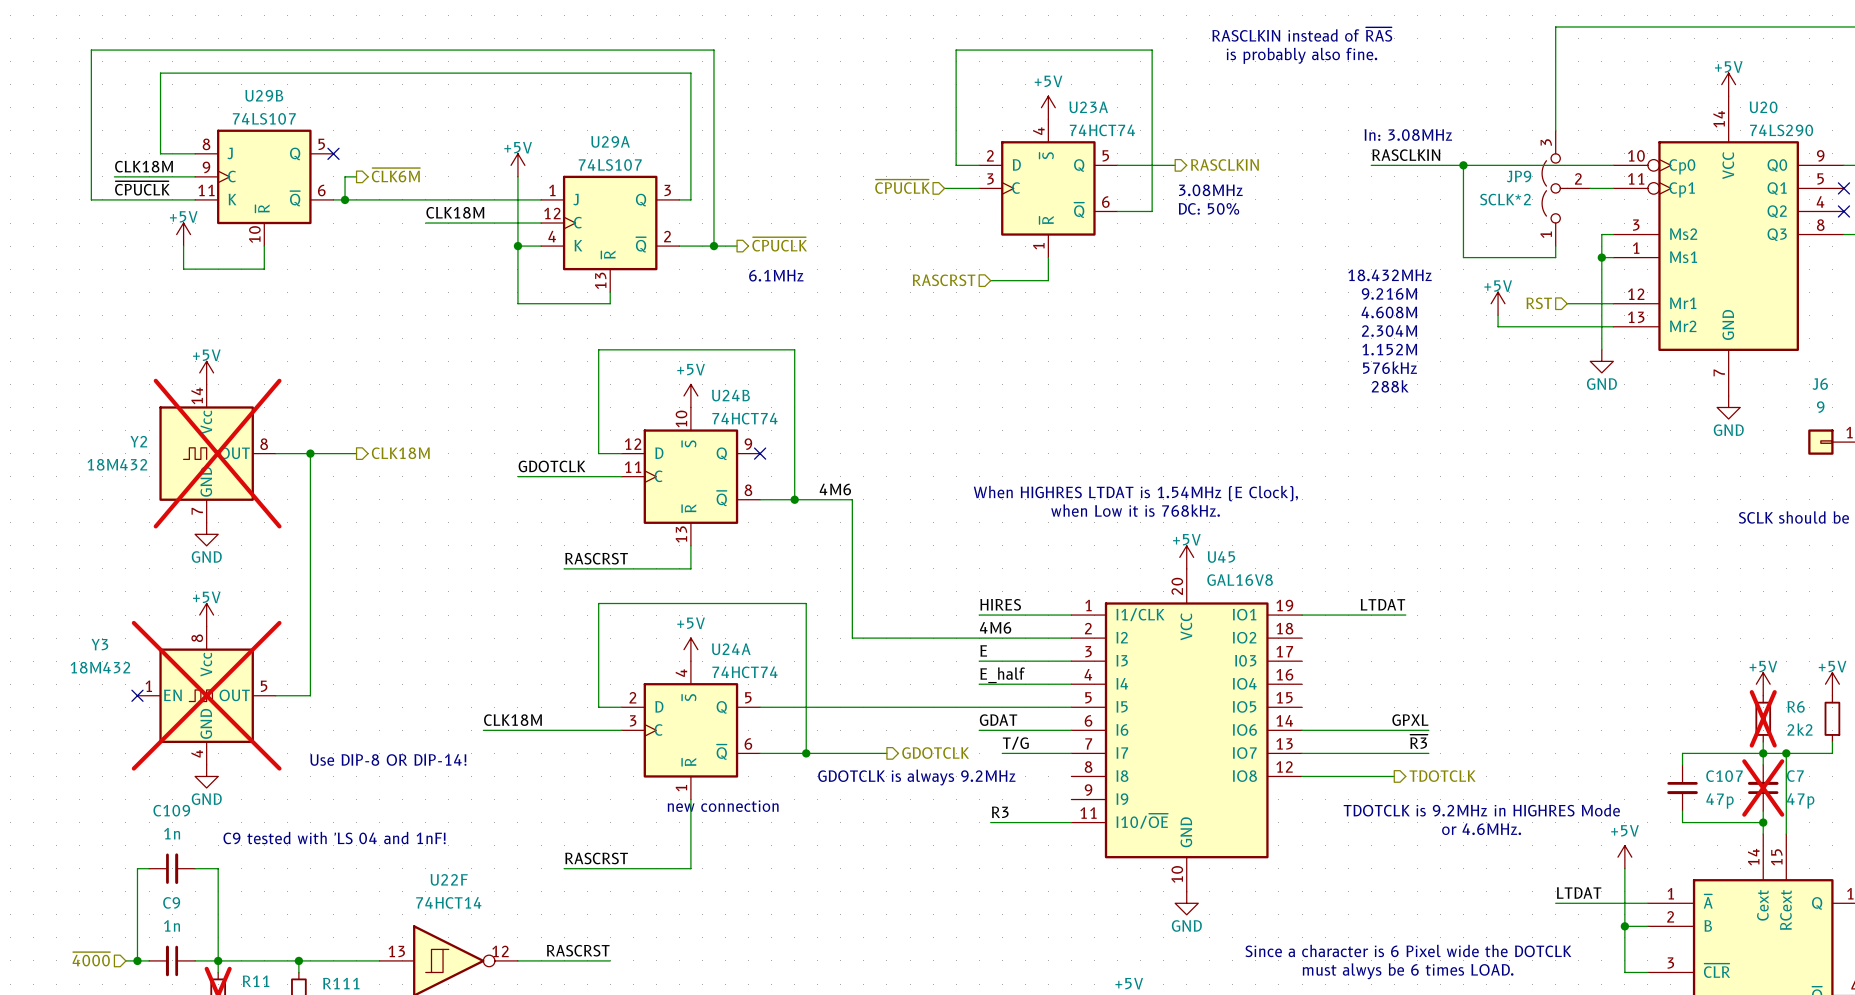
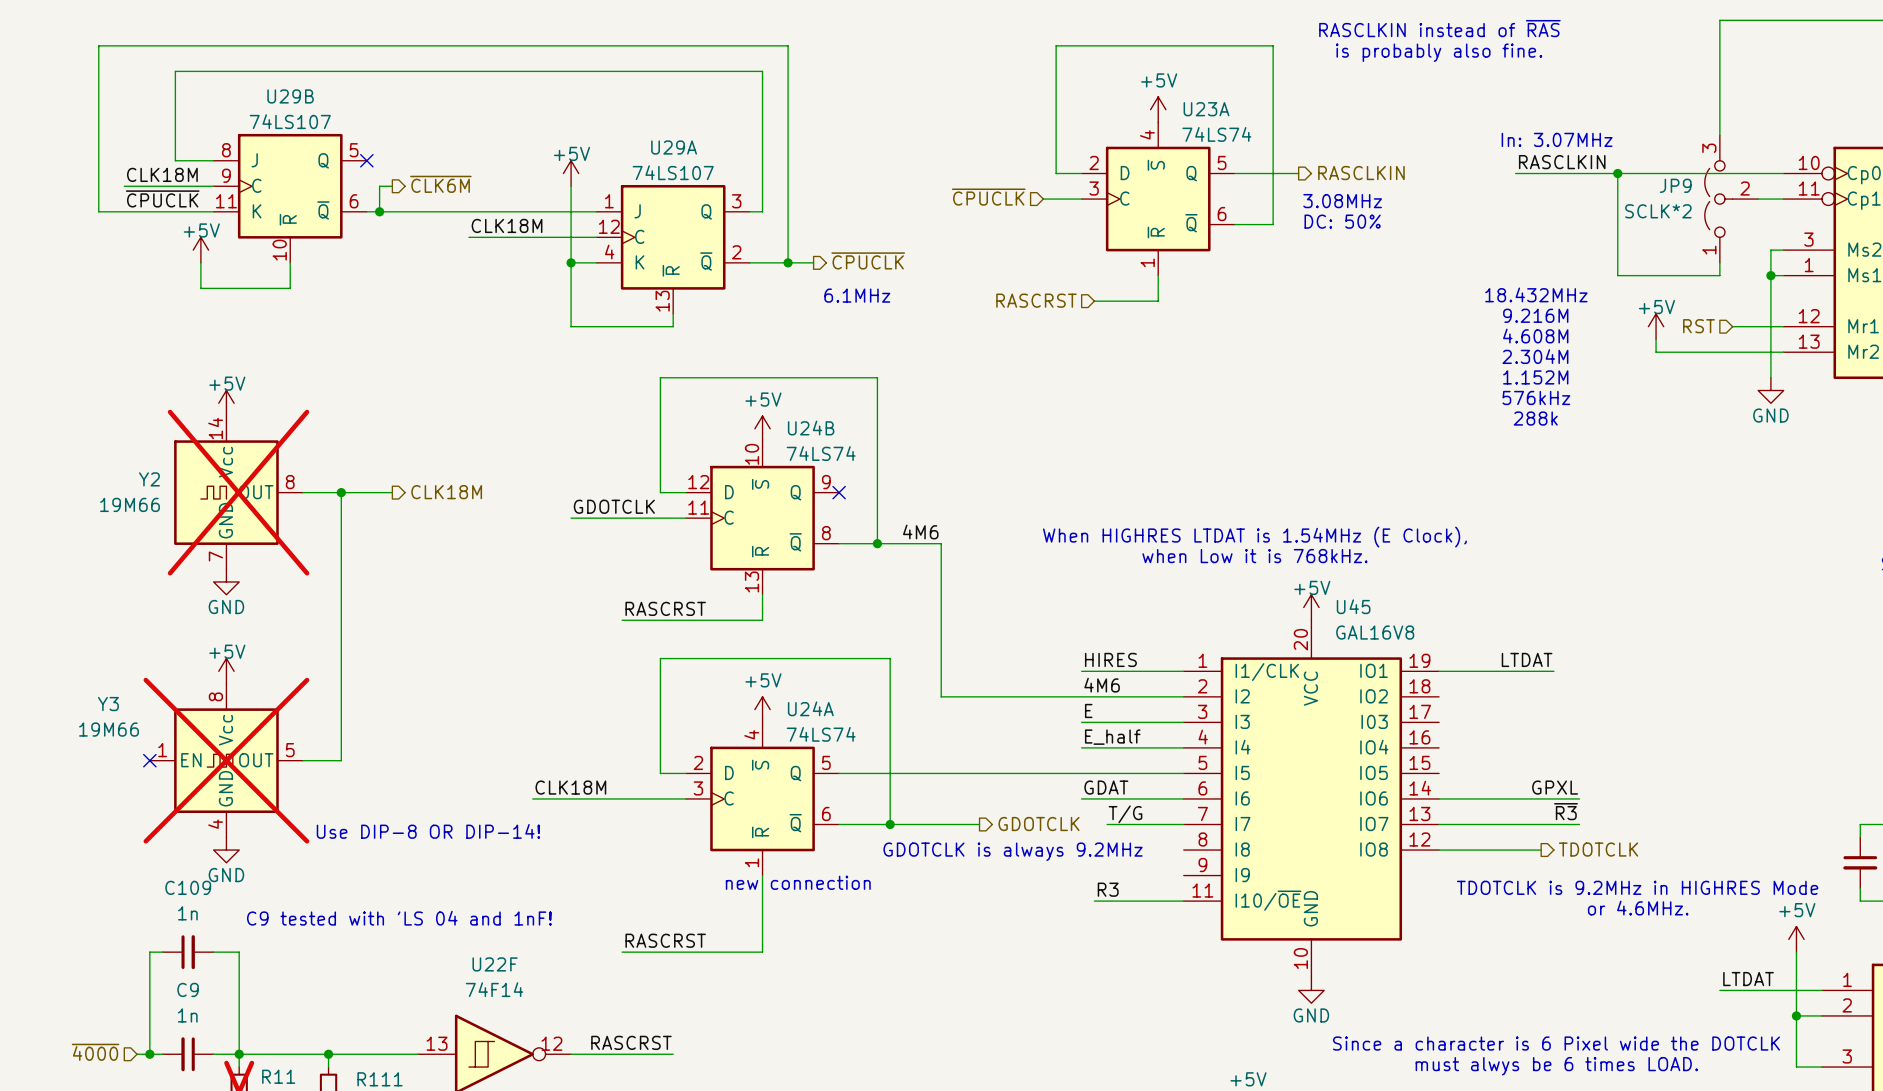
U23A value: 74HCT74 (1102, 130) -> 74LS74 (1216, 134)
text: In: 3.08MHz (1408, 135) -> In: 3.07MHz (1557, 139)
U24B value: 74HCT74 (744, 418) -> 74LS74 (821, 453)
Y2 value: 18M432 (117, 464) -> 19M66 (129, 504)
Y3 value: 18M432 (100, 667) -> 19M66 (109, 729)
U24A value: 74HCT74 (744, 672) -> 74LS74 (821, 734)
U22F value: 74HCT14 (448, 902) -> 74F14 (494, 989)

